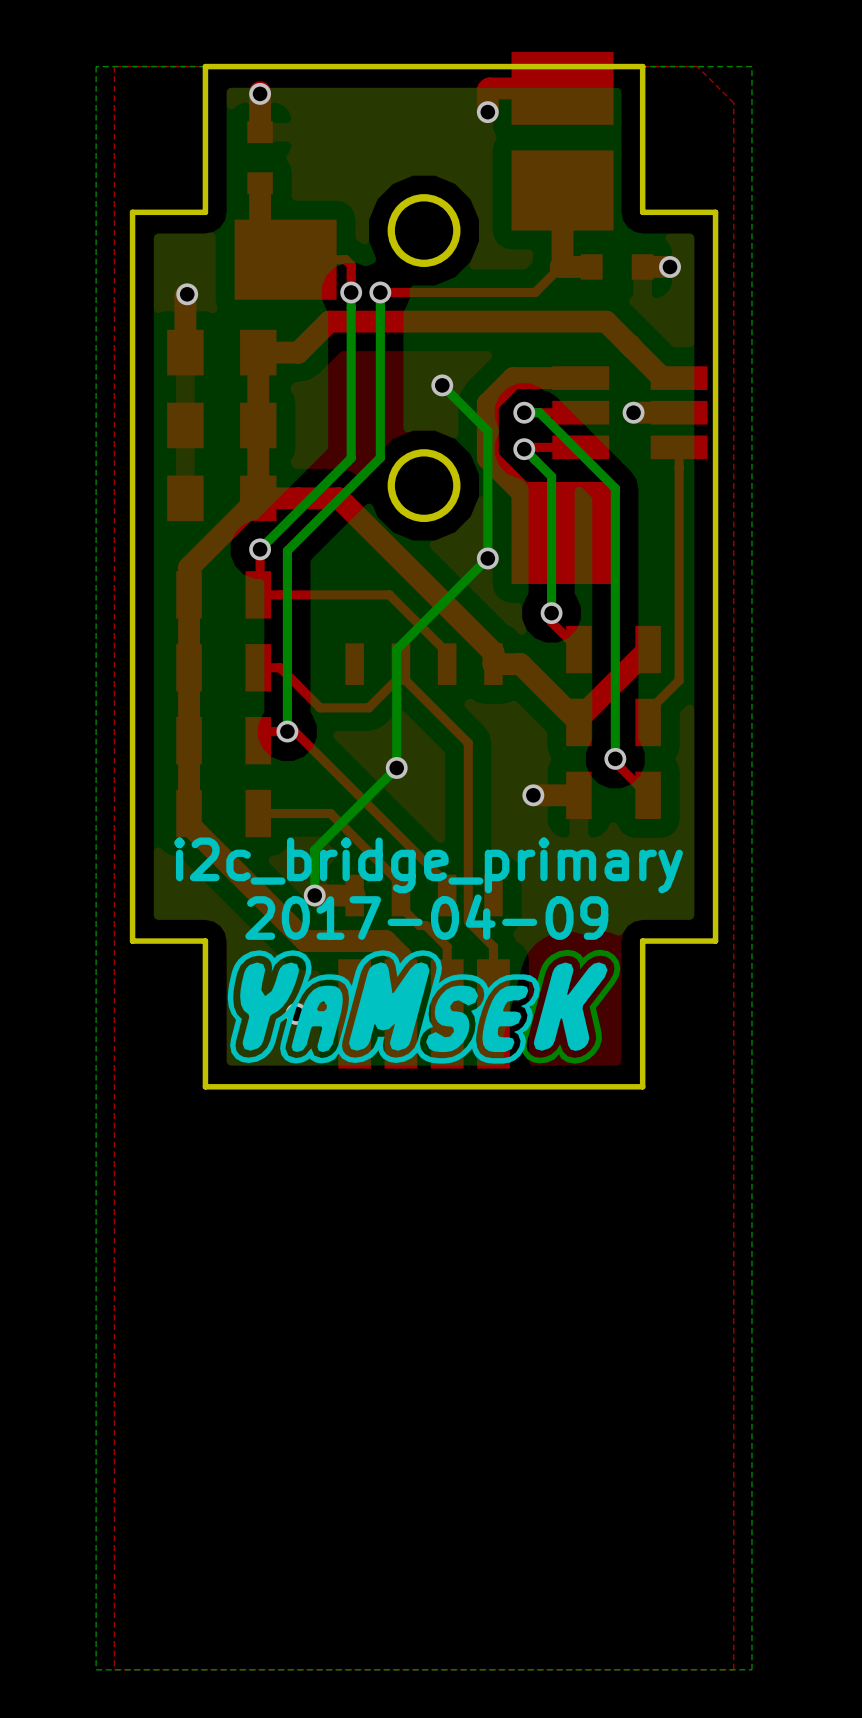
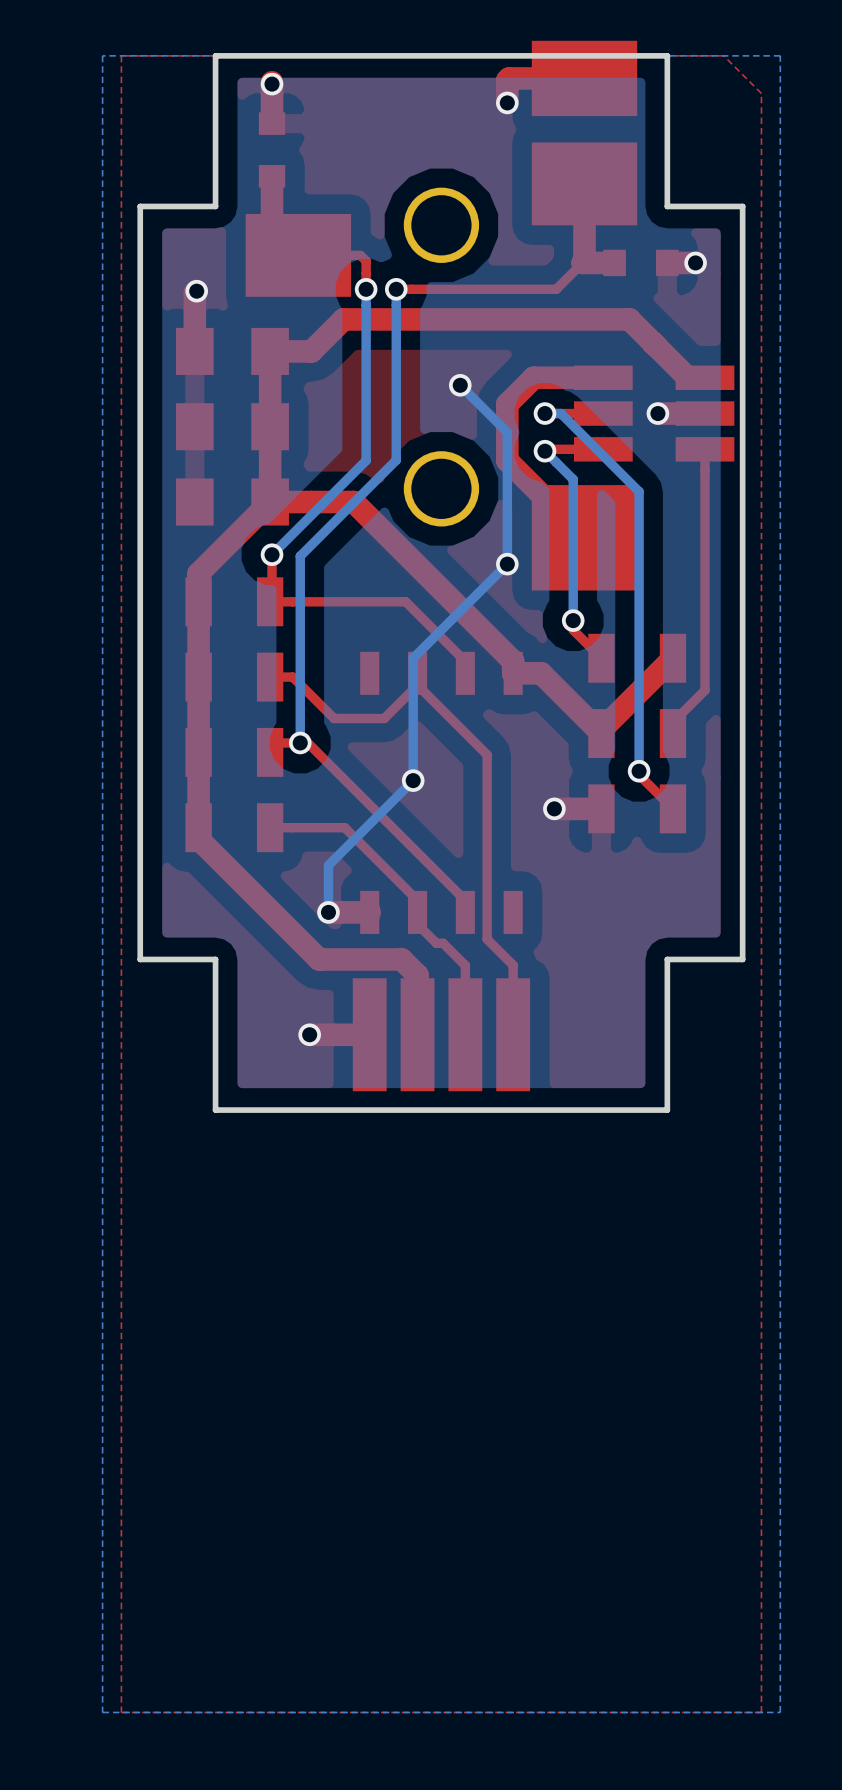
text: i2c_bridge_primary (428, 865) -> none
text: 2017-04-09 (426, 917) -> none
drawing: [227, 949, 621, 1064] -> none

